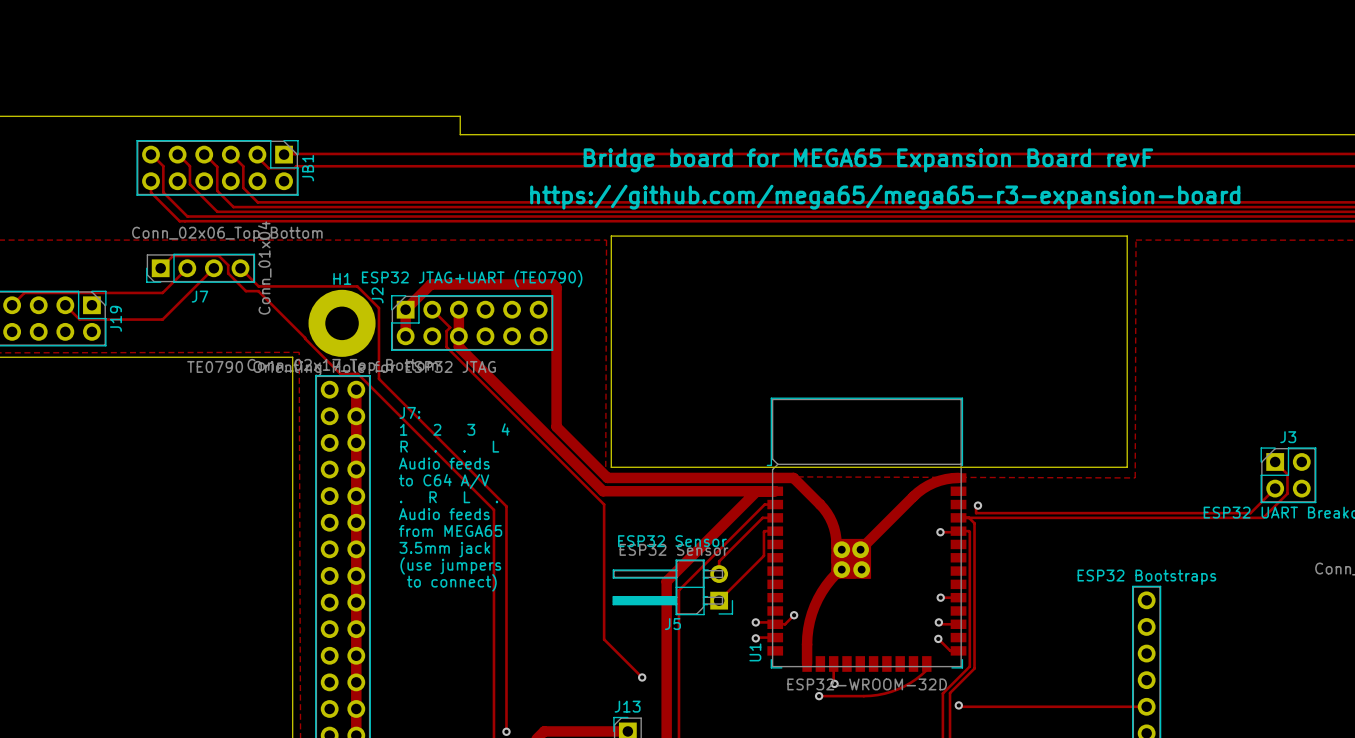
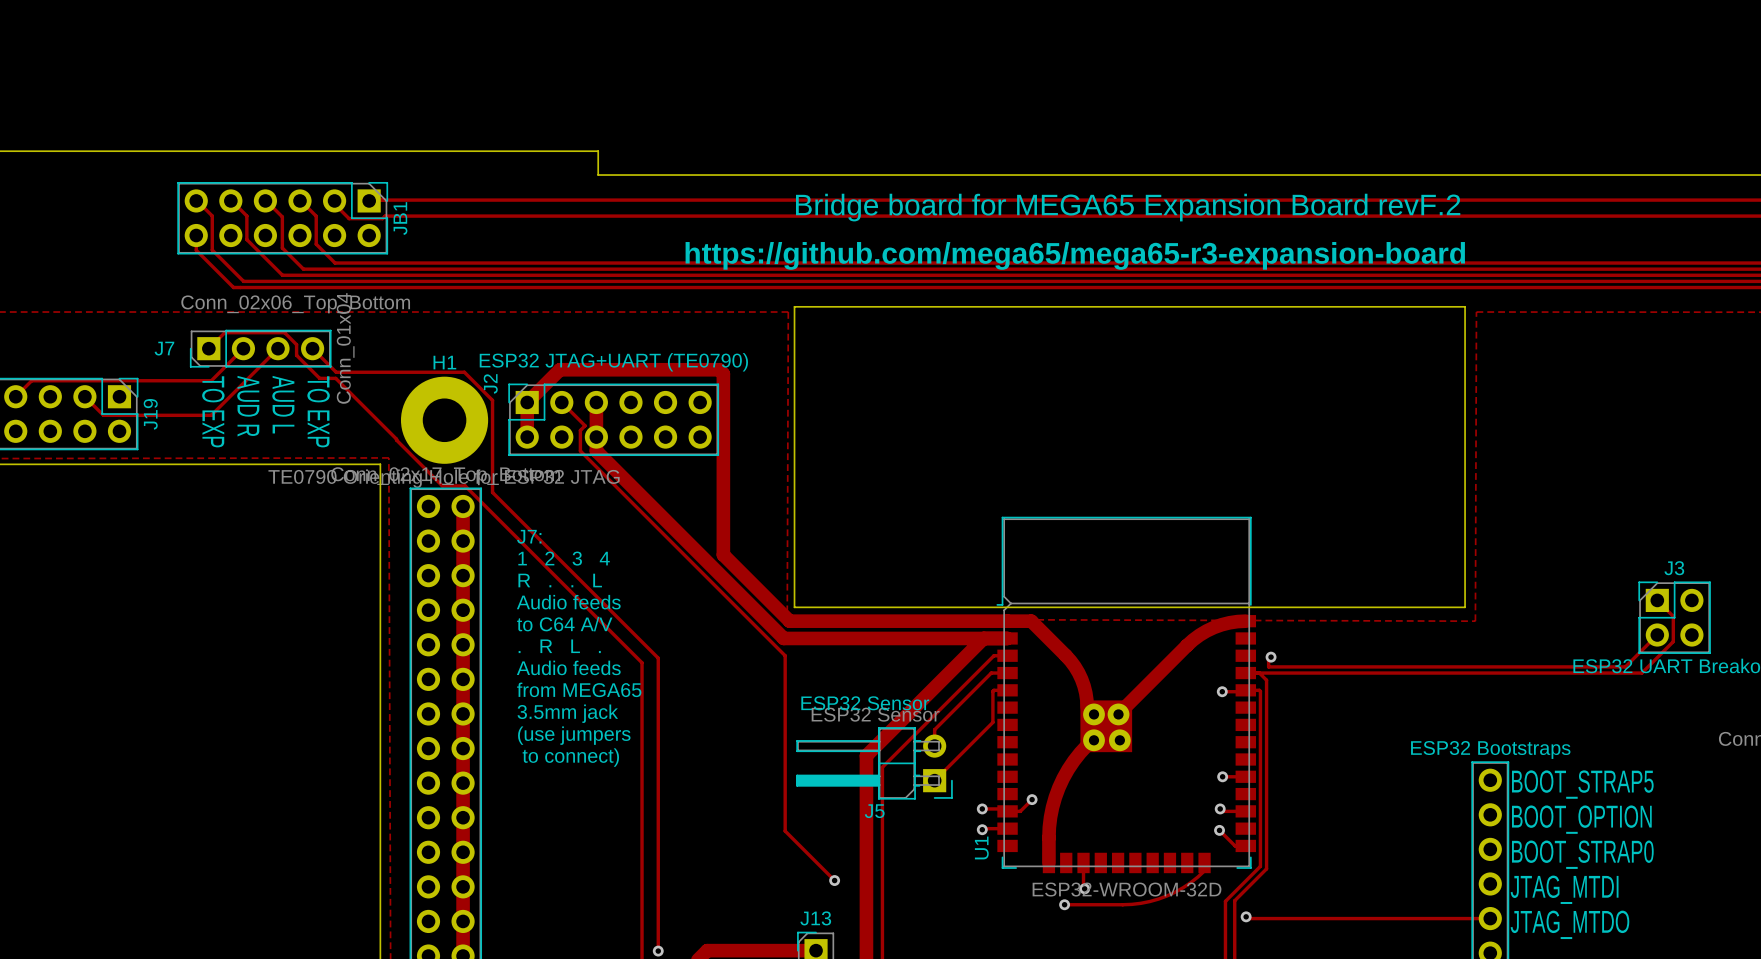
text: Bridge board for MEGA65 Expansion Board revF (868, 160) -> Bridge board for MEGA65 Expansion Board revF.2 (1128, 207)
J7 name position: J7 (199, 296) -> J7 (164, 348)
text: none -> AUD L (283, 404)
text: none -> AUD R (248, 406)
text: none -> TO EXP (213, 411)
text: none -> TO EXP (318, 411)
text: none -> BOOT_STRAP5 (1582, 784)
text: none -> BOOT_OPTION (1581, 819)
text: none -> BOOT_STRAP0 (1582, 854)
text: none -> JTAG_MTDI (1564, 889)
text: none -> JTAG_MTDO (1569, 924)

